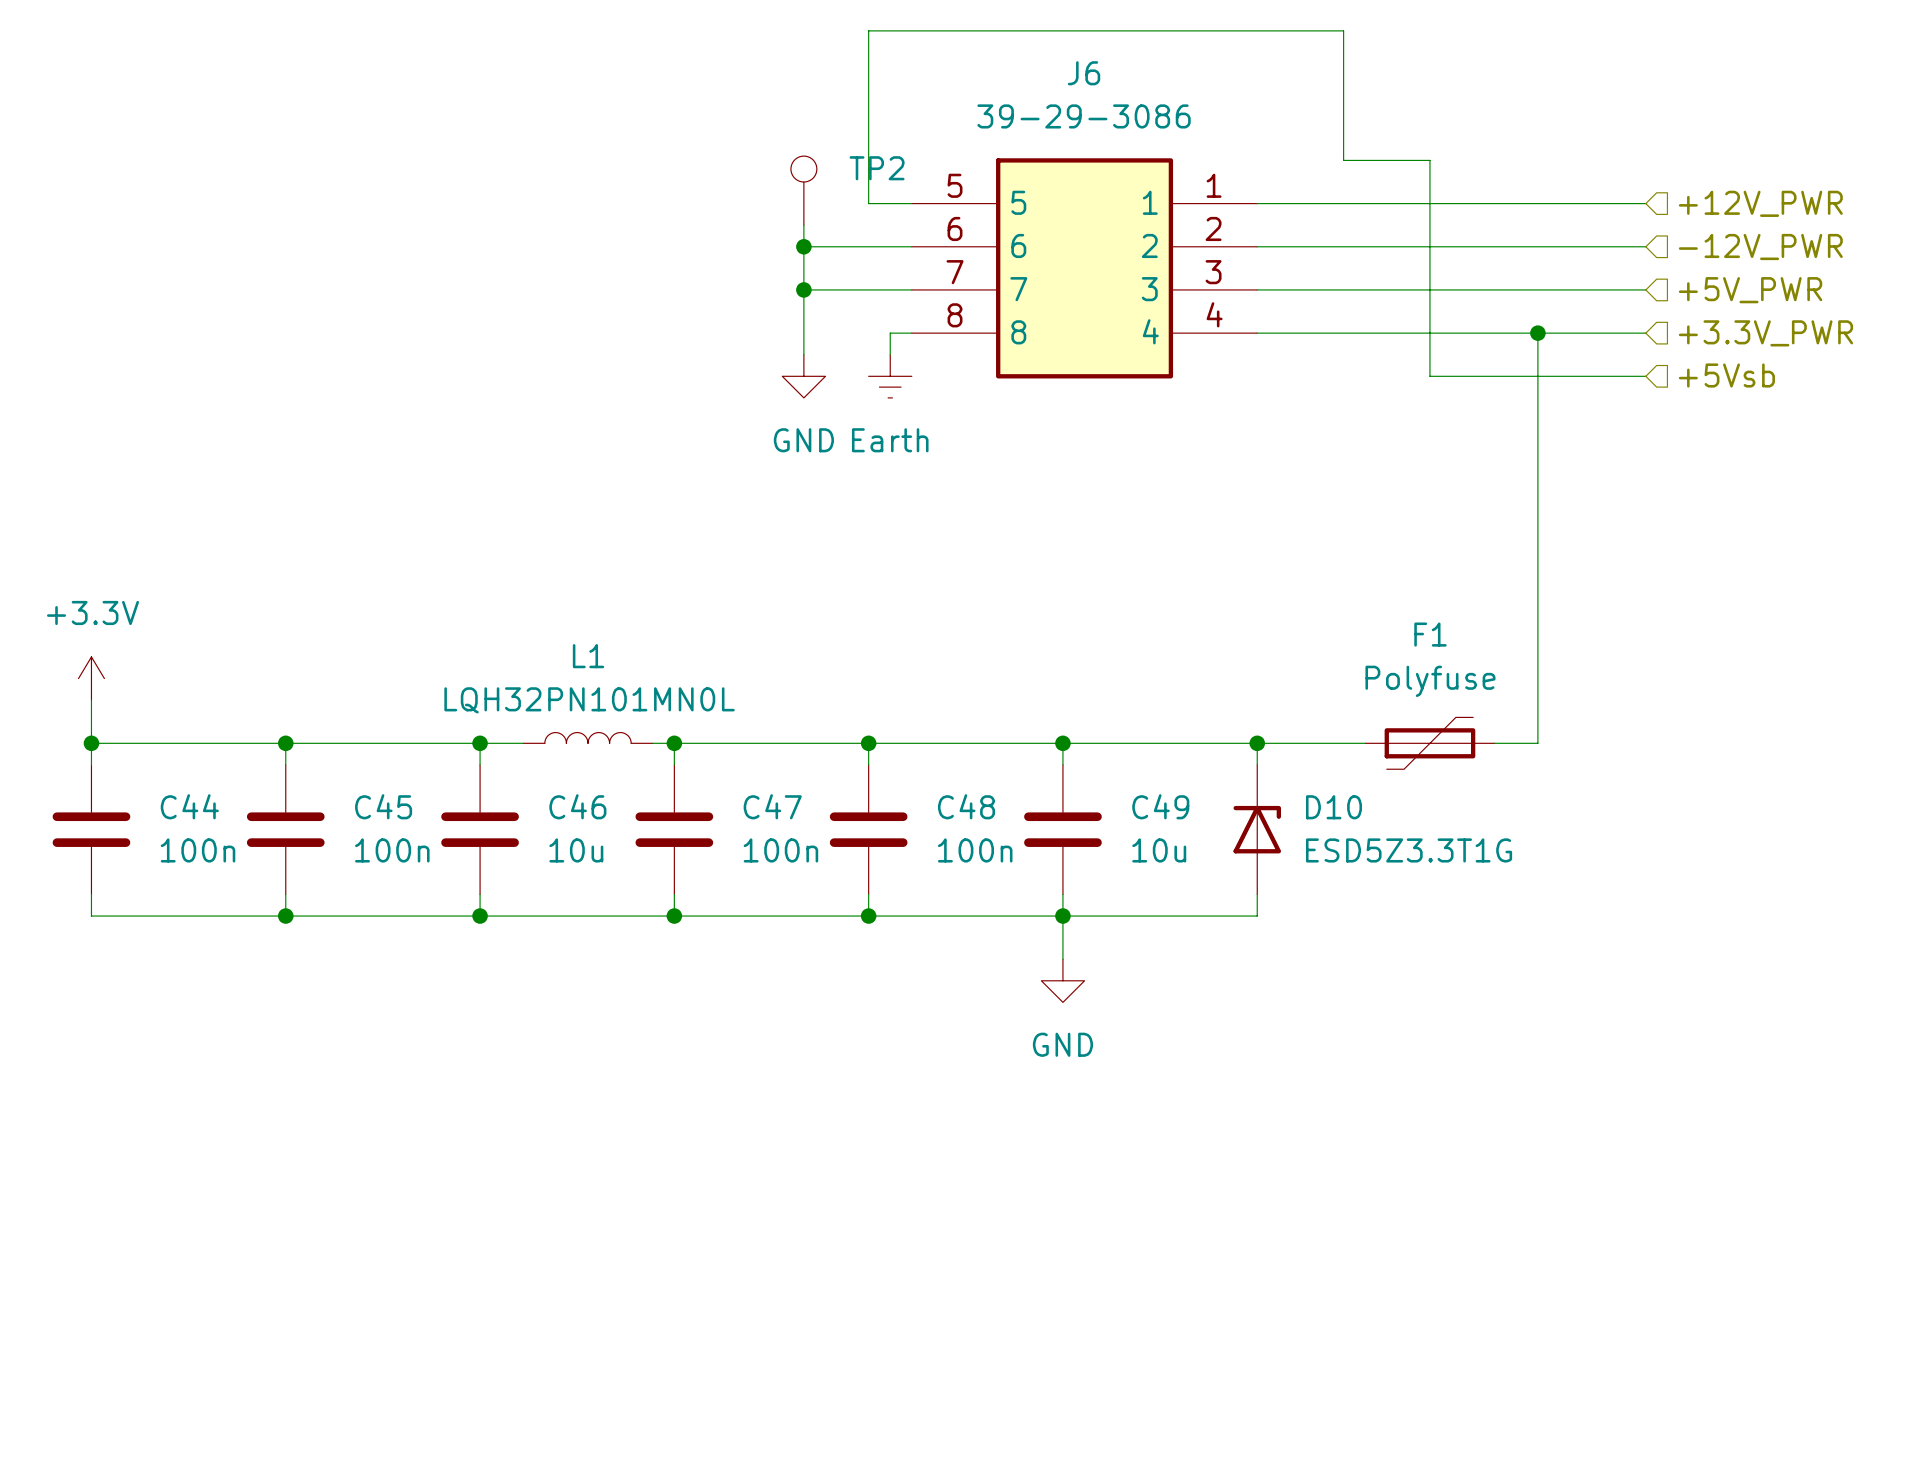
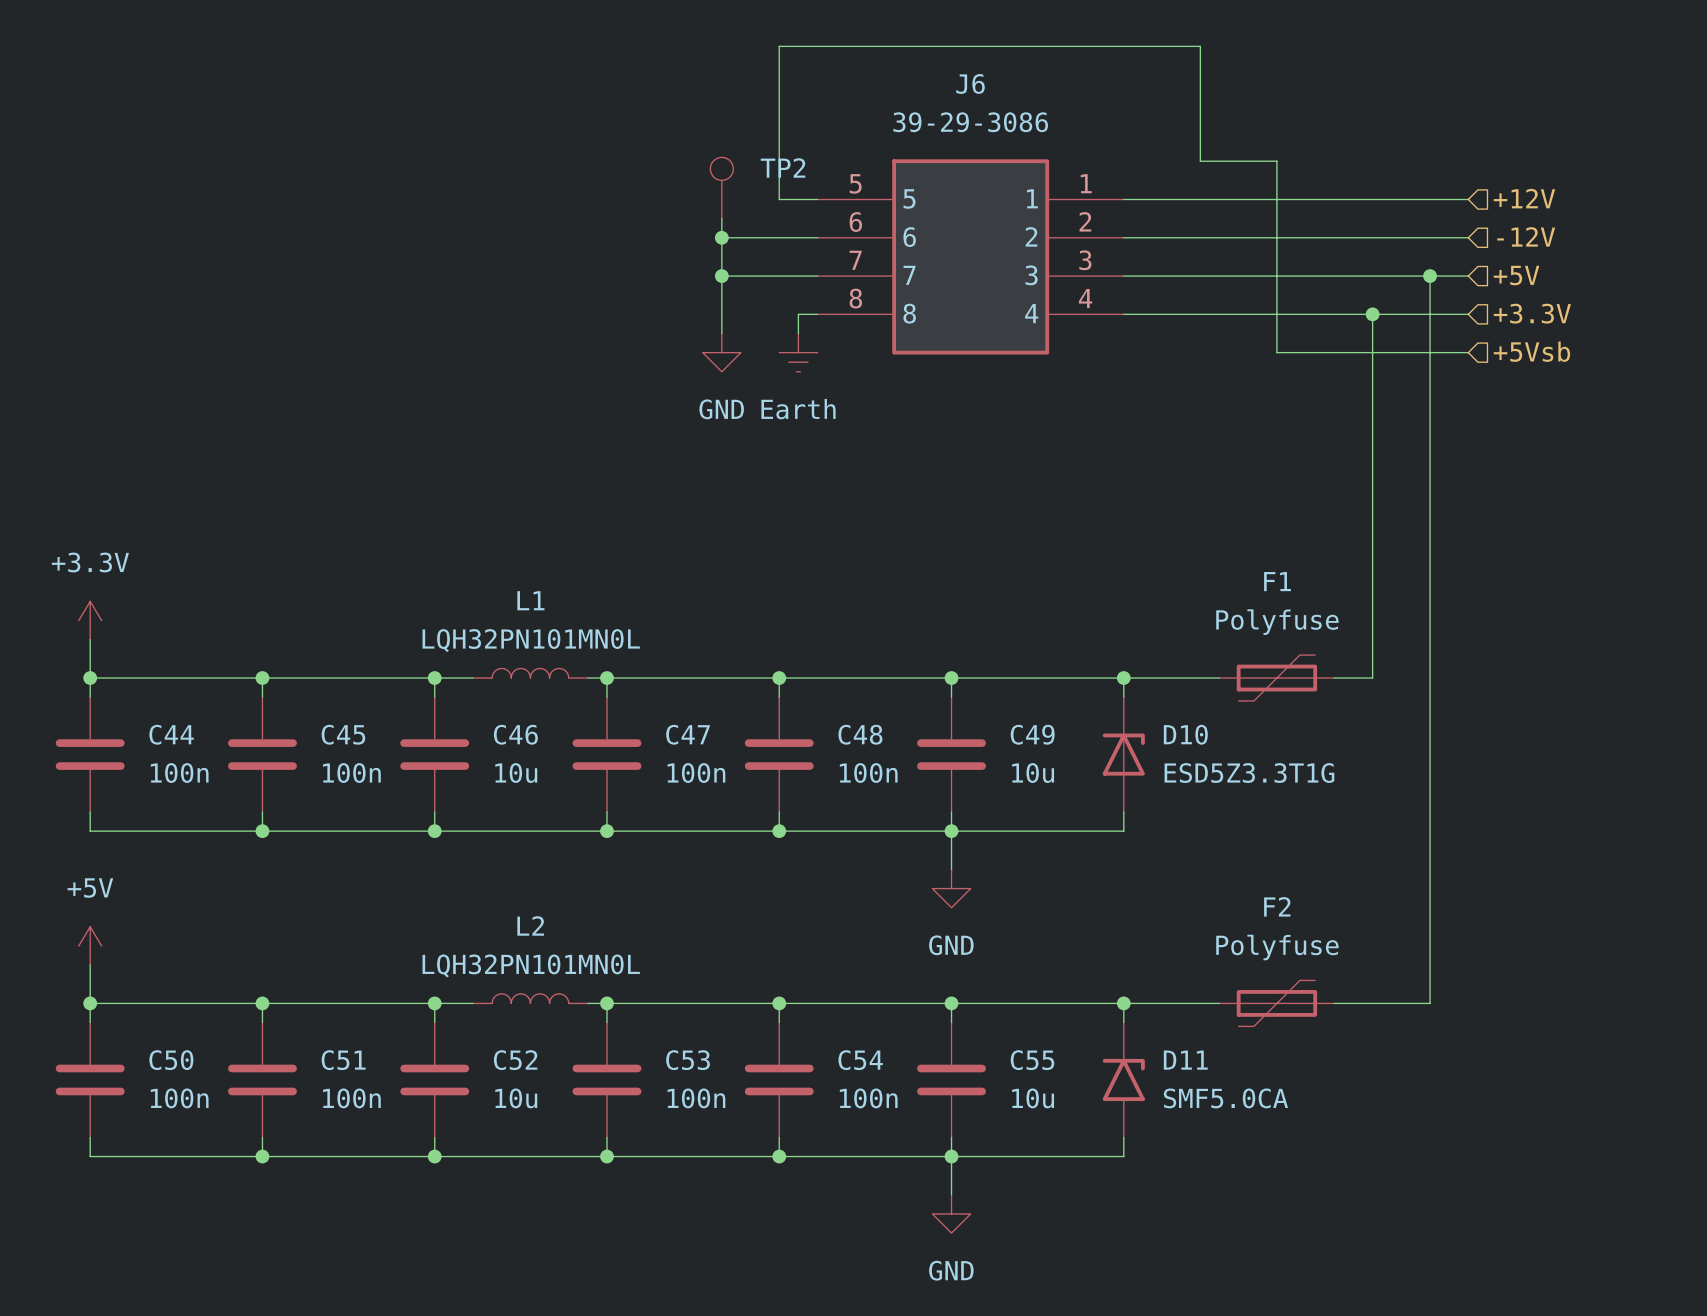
hierarchical label: +12V_PWR (1760, 203) -> +12V (1524, 198)
hierarchical label: -12V_PWR (1760, 247) -> -12V (1526, 236)
wire: none -> (1430, 276) (1430, 1003) (1334, 1003)
junction: none -> (1430, 276)
hierarchical label: +5V_PWR (1750, 290) -> +5V (1516, 275)
hierarchical label: +3.3V_PWR (1765, 333) -> +3.3V (1532, 313)
power symbol: none -> +5V (90, 945)
wire: none -> (90, 965) (90, 1022)
L2: none -> LQH32PN101MN0L (530, 998)
wire: none -> (90, 1003) (473, 1003)
junction: none -> (90, 1003)
wire: none -> (262, 1003) (262, 1022)
junction: none -> (262, 1003)
wire: none -> (434, 1003) (434, 1022)
junction: none -> (434, 1003)
wire: none -> (587, 1003) (1219, 1003)
wire: none -> (606, 1003) (606, 1022)
junction: none -> (606, 1003)
wire: none -> (779, 1003) (779, 1022)
junction: none -> (779, 1003)
wire: none -> (951, 1003) (951, 1022)
junction: none -> (951, 1003)
wire: none -> (1123, 1003) (1123, 1022)
junction: none -> (1123, 1003)
F2: none -> Polyfuse (1276, 1003)
C50: none -> 100n (90, 1079)
C51: none -> 100n (262, 1079)
C52: none -> 10u (434, 1079)
C53: none -> 100n (606, 1079)
C54: none -> 100n (779, 1079)
C55: none -> 10u (951, 1079)
D11: none -> SMF5.0CA (1123, 1079)
wire: none -> (90, 1137) (90, 1156) (1123, 1156) (1123, 1137)
wire: none -> (262, 1137) (262, 1156)
wire: none -> (434, 1137) (434, 1156)
wire: none -> (606, 1137) (606, 1156)
wire: none -> (779, 1137) (779, 1156)
wire: none -> (951, 1137) (951, 1194)
junction: none -> (262, 1156)
junction: none -> (434, 1156)
junction: none -> (606, 1156)
junction: none -> (779, 1156)
junction: none -> (951, 1156)
power symbol: none -> GND (951, 1213)

